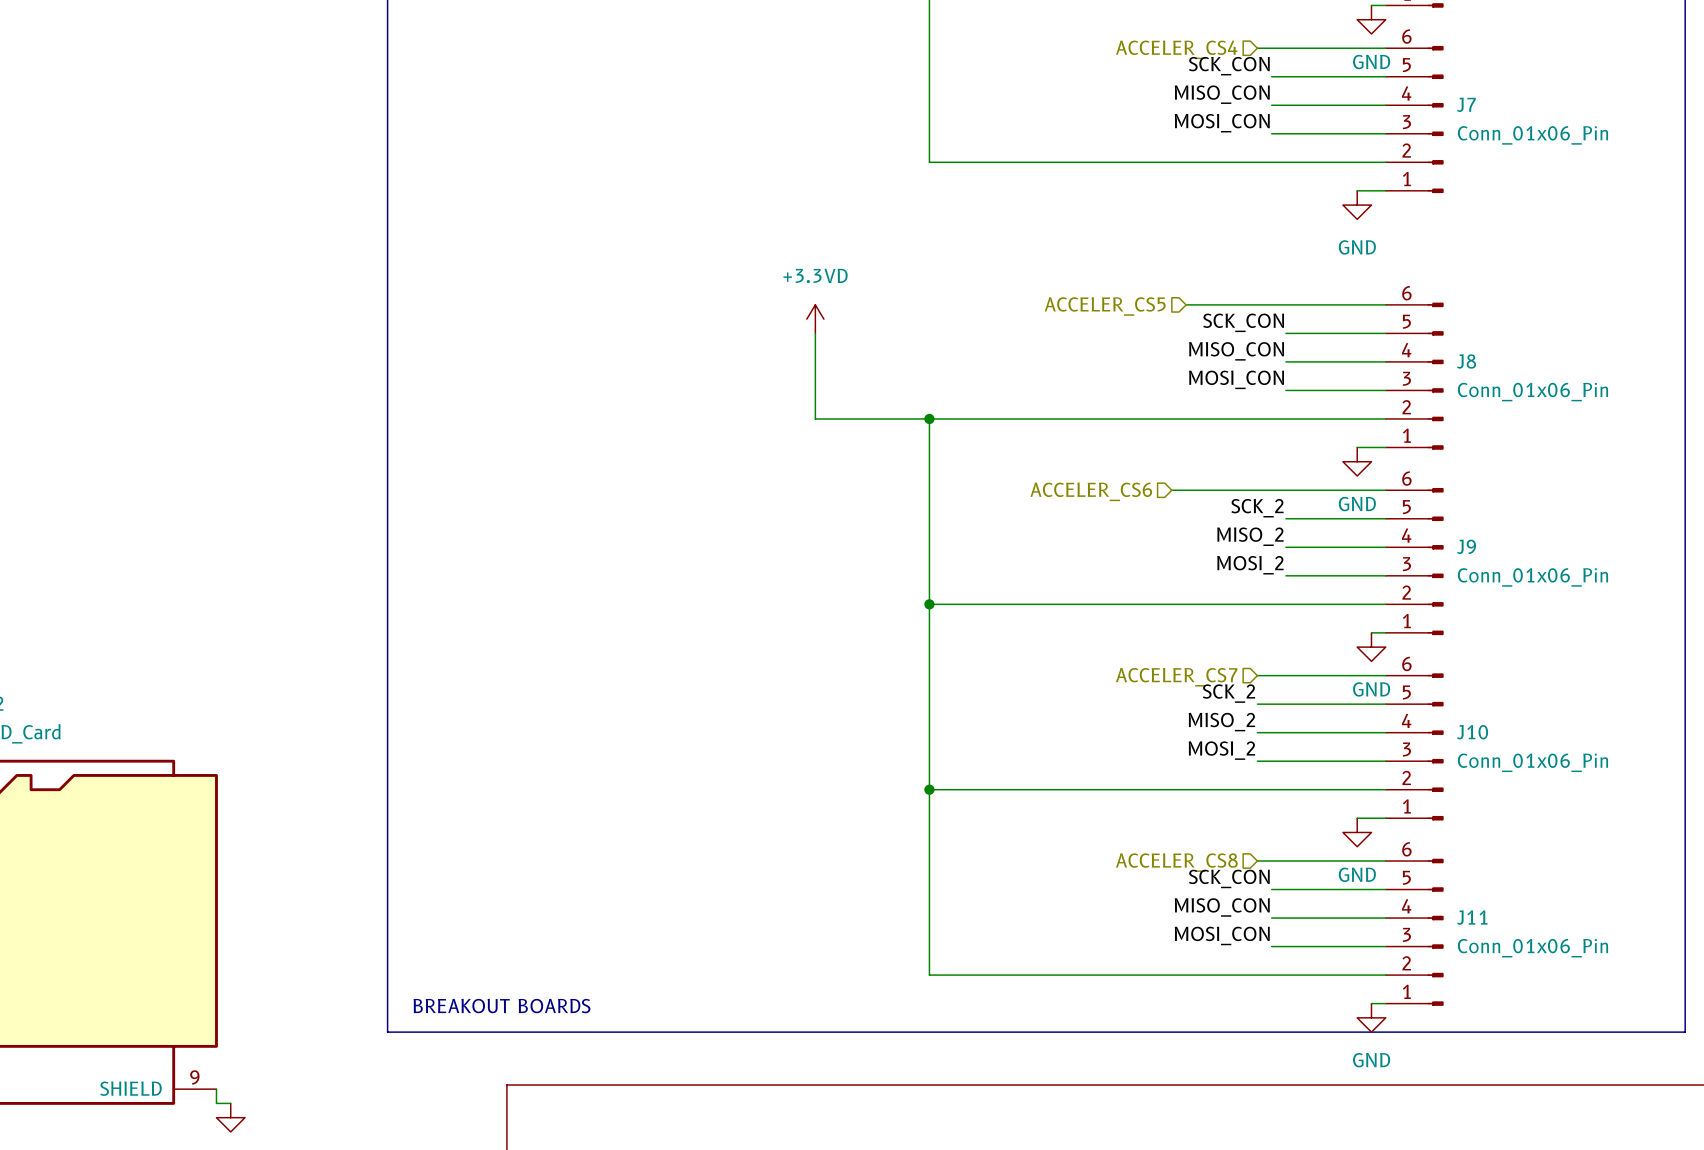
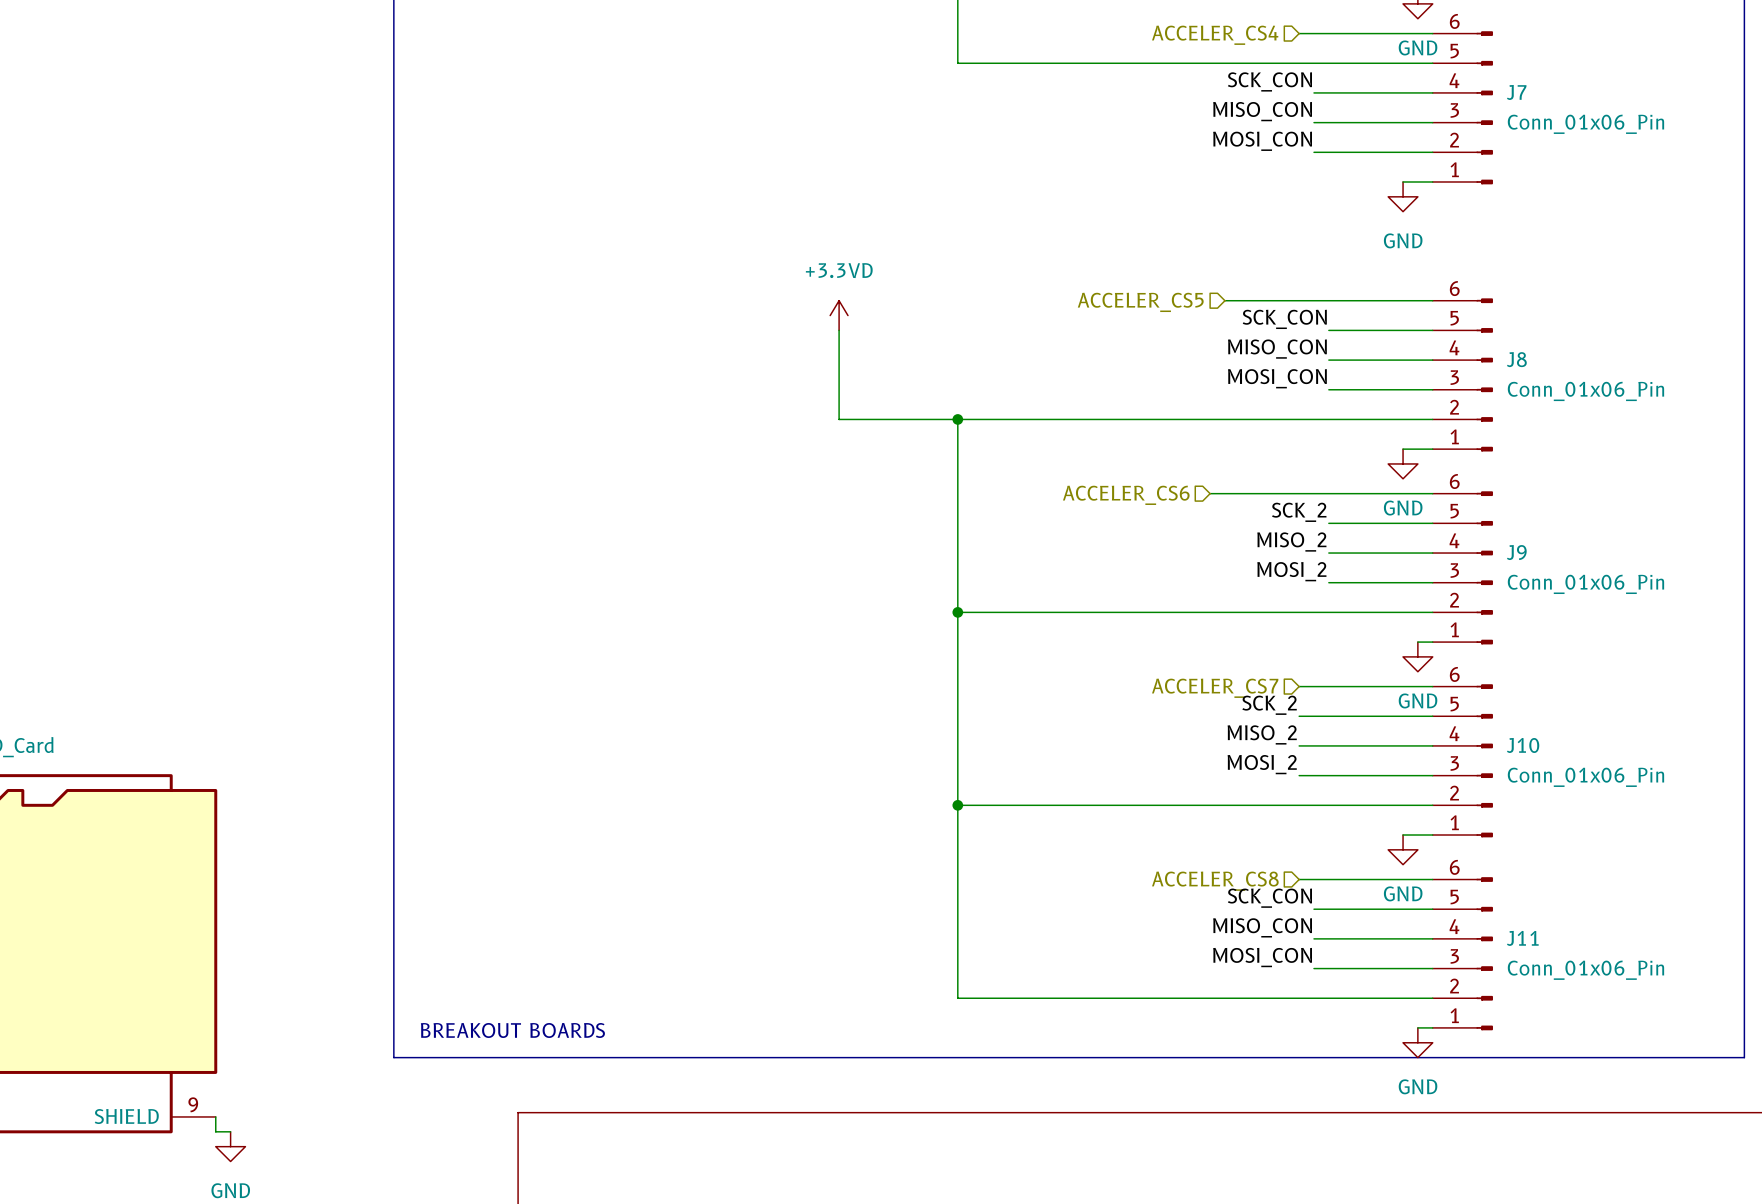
label: SCK_CON (1229, 66) -> none
wire: (929, 76) (929, 162) (1271, 162) -> (957, 63) (1313, 63)
label: MISO_CON (1222, 94) -> SCK_CON (1269, 81)
label: MOSI_CON (1222, 123) -> MISO_CON (1262, 111)
label: none -> MOSI_CON (1262, 141)

